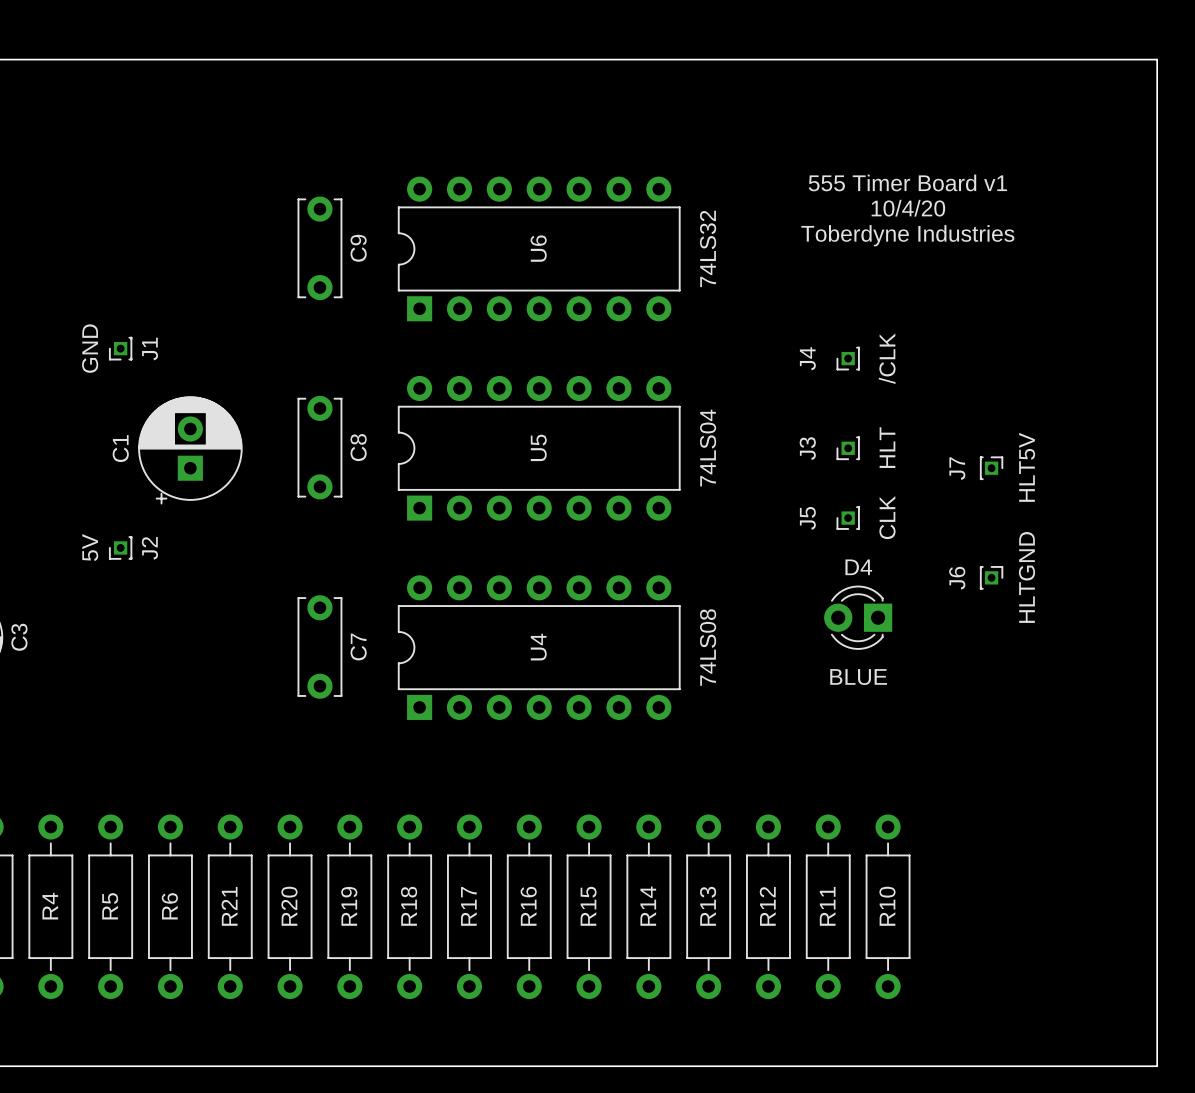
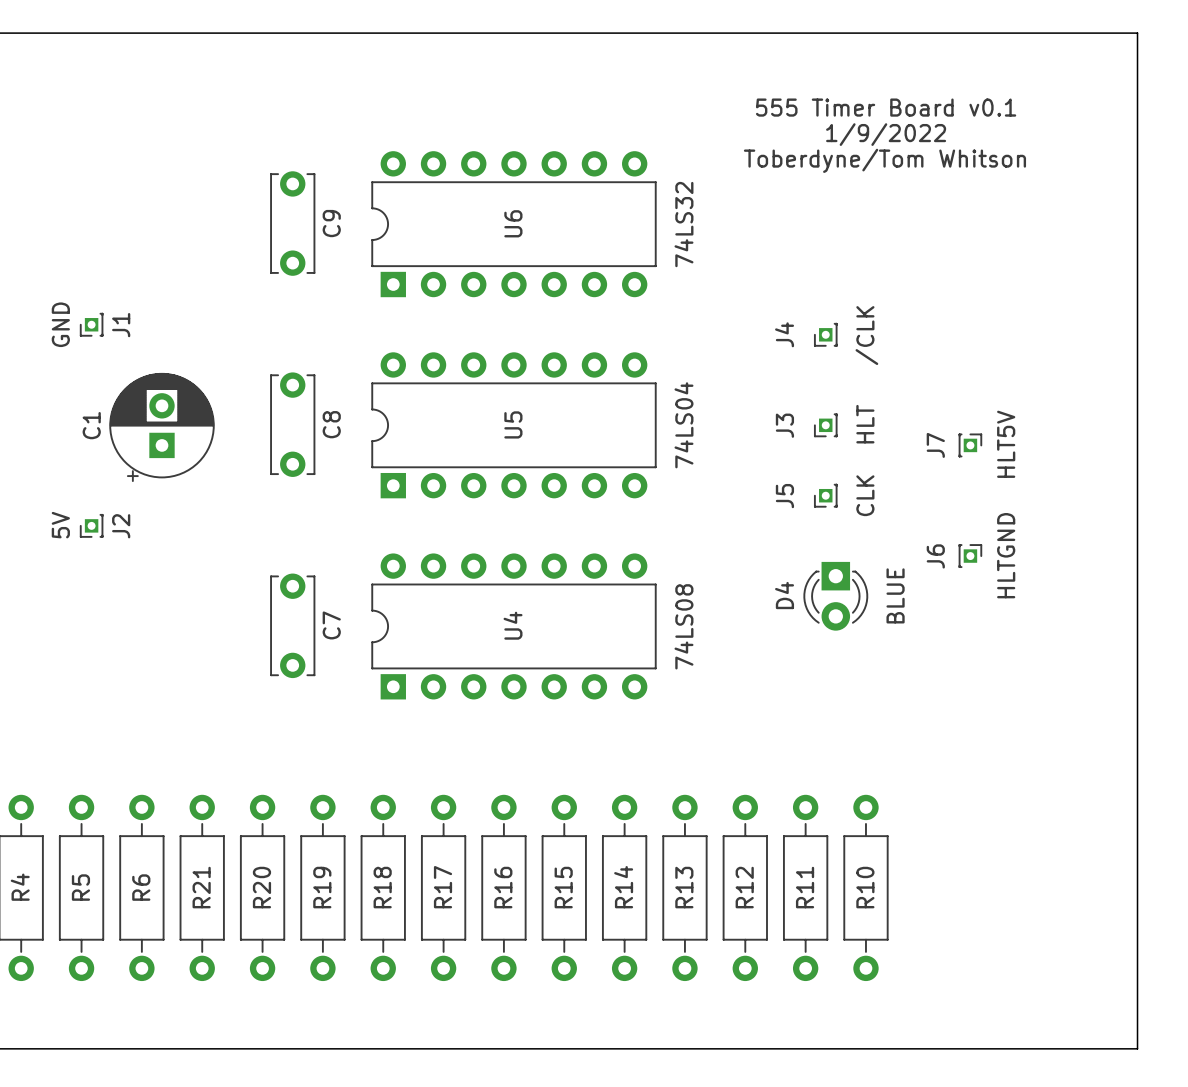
text: none -> 555 Timer Board v0.1 (886, 107)
text: none -> 1/9/2022 (886, 134)
text: 555 Timer Board v1 (907, 182) -> Toberdyne/Tom Whitson (884, 160)
text: 10/4/20 (908, 208) -> none
text: Toberdyne Industries (907, 235) -> none
D4 rotation: 0° (858, 617) -> 90° counterclockwise (835, 596)

